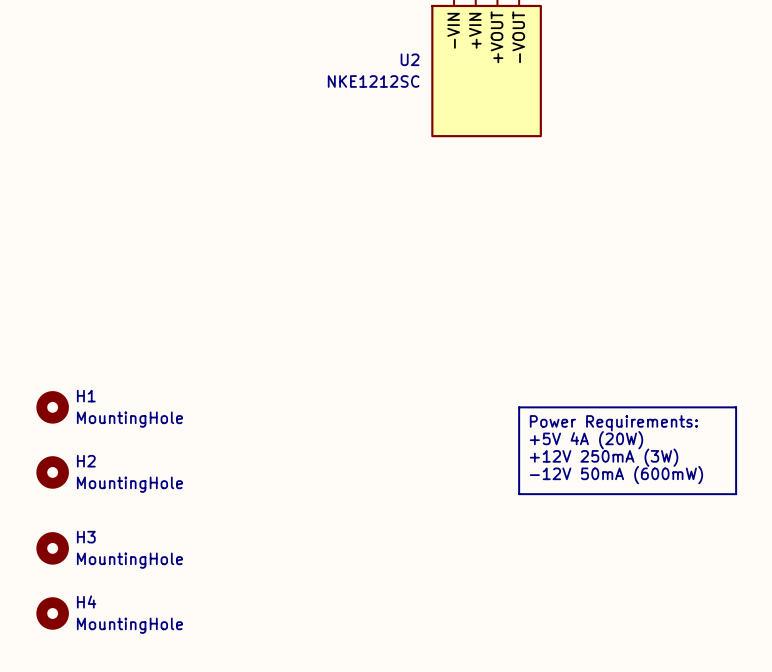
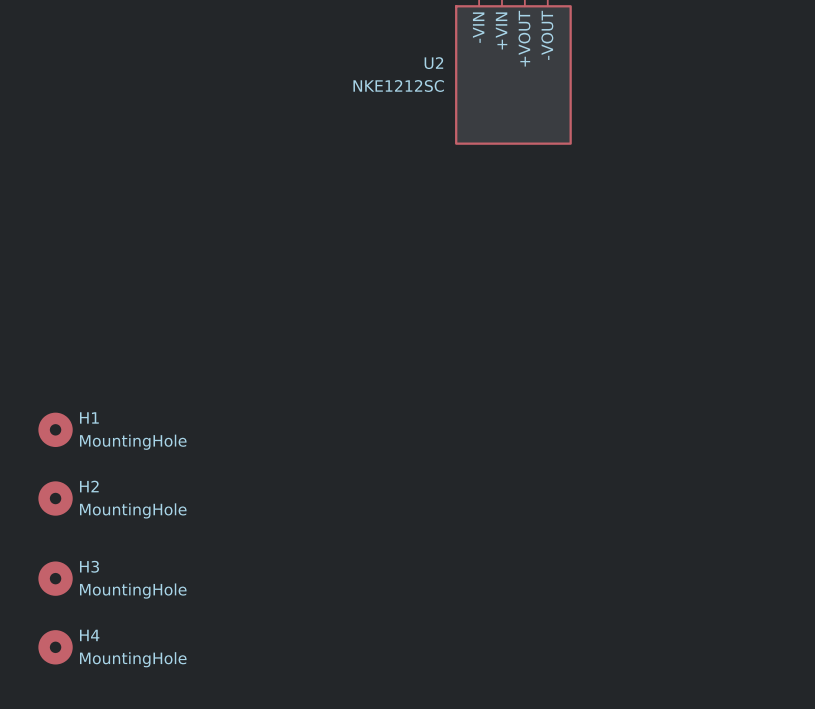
line: (519, 407) (736, 407) (736, 494) (519, 494) (519, 407) -> none
text: Power Requirements: (613, 423) -> none
text: +5V 4A (20W) (586, 440) -> none
text: +12V 250mA (3W) (604, 457) -> none
text: -12V 50mA (600mW) (616, 475) -> none

